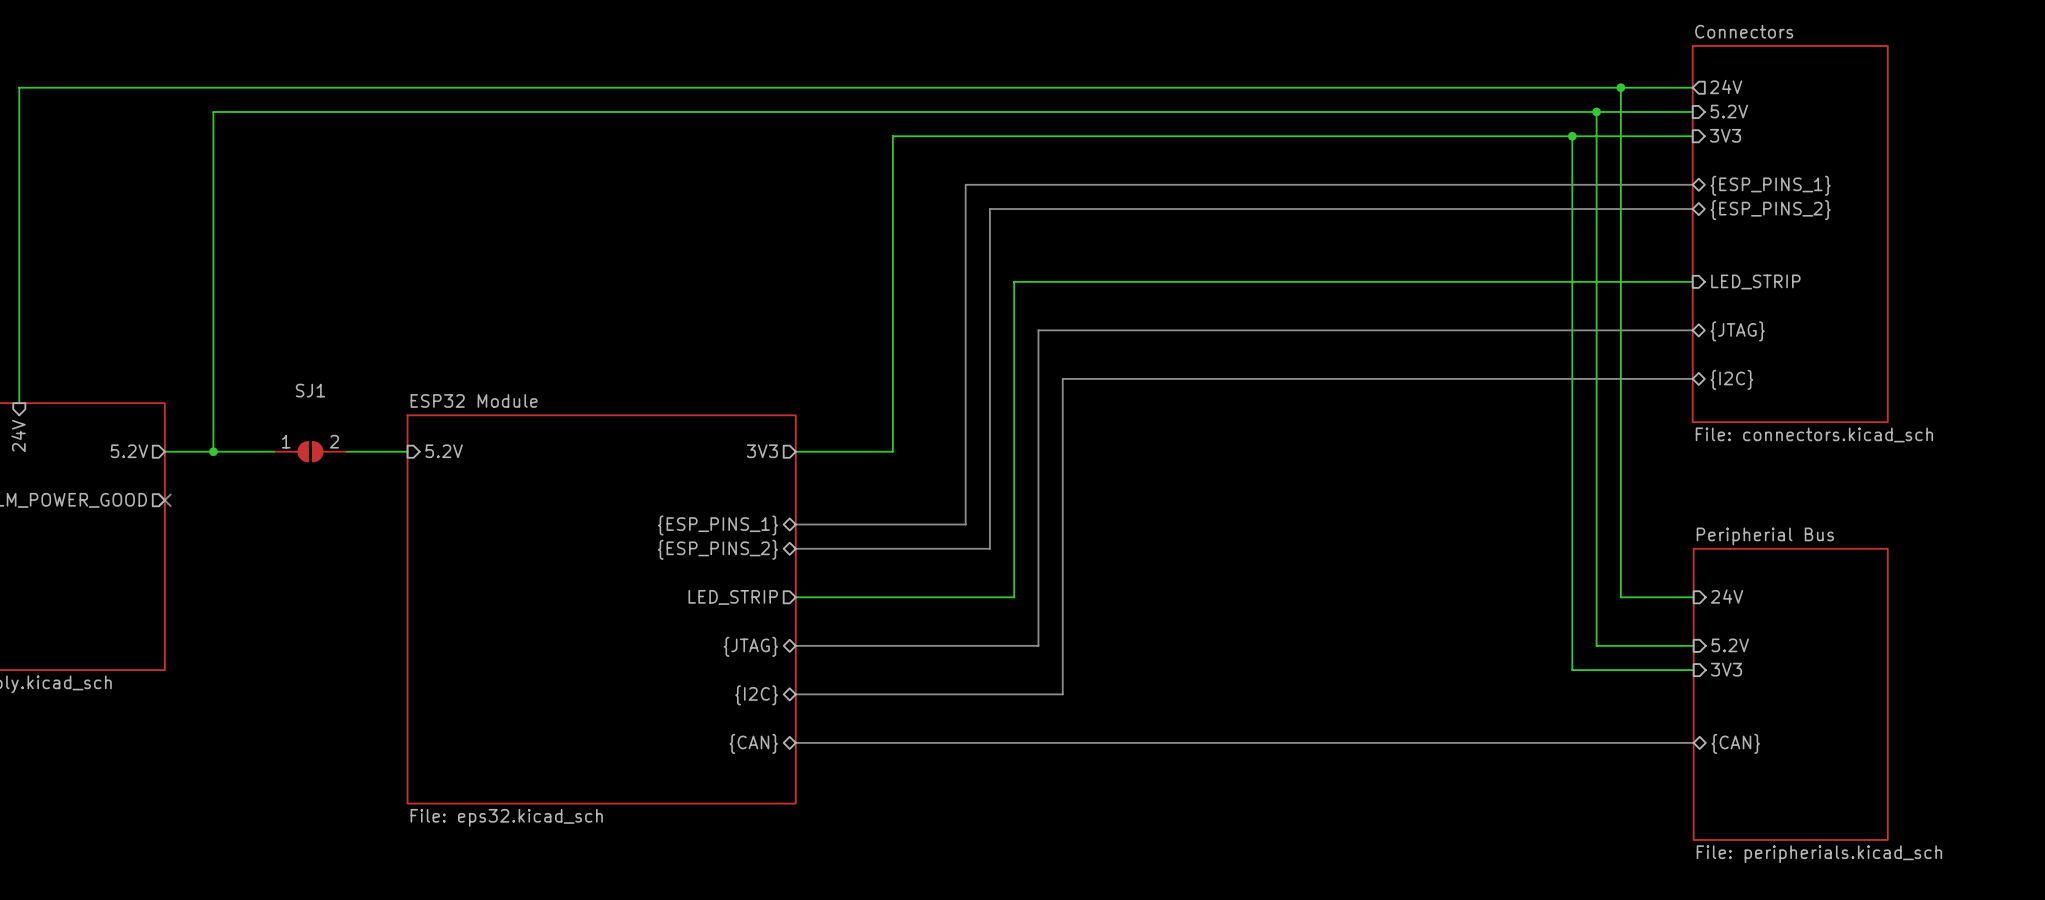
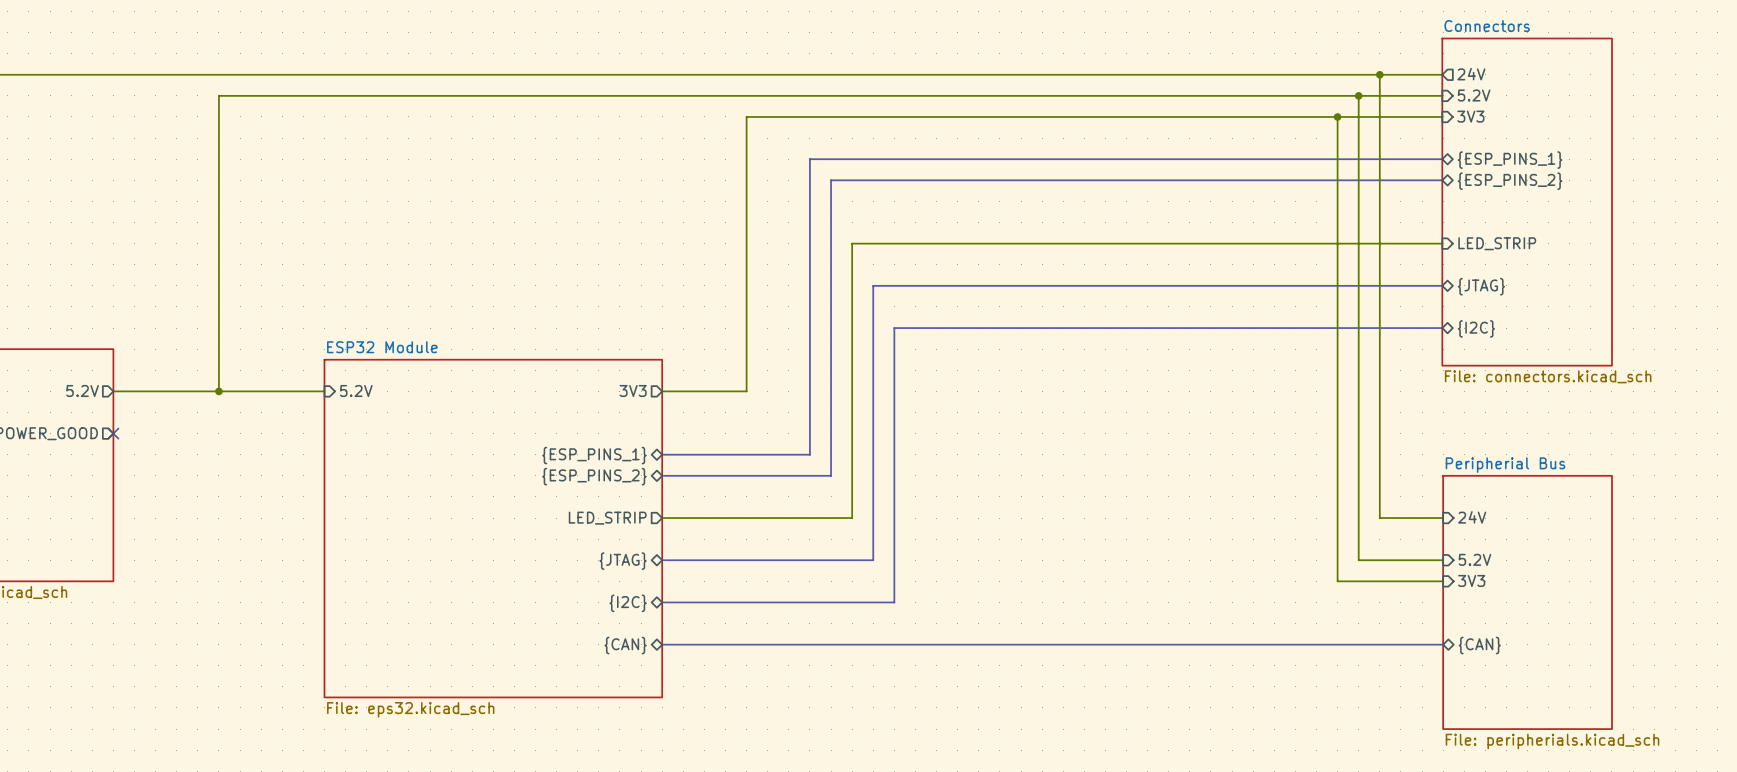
wire: (286, 111) (213, 111) (213, 451) -> (218, 95) (218, 391)
junction: (213, 451) -> none
junction: none -> (218, 391)
SJ1: (310, 451) -> none

